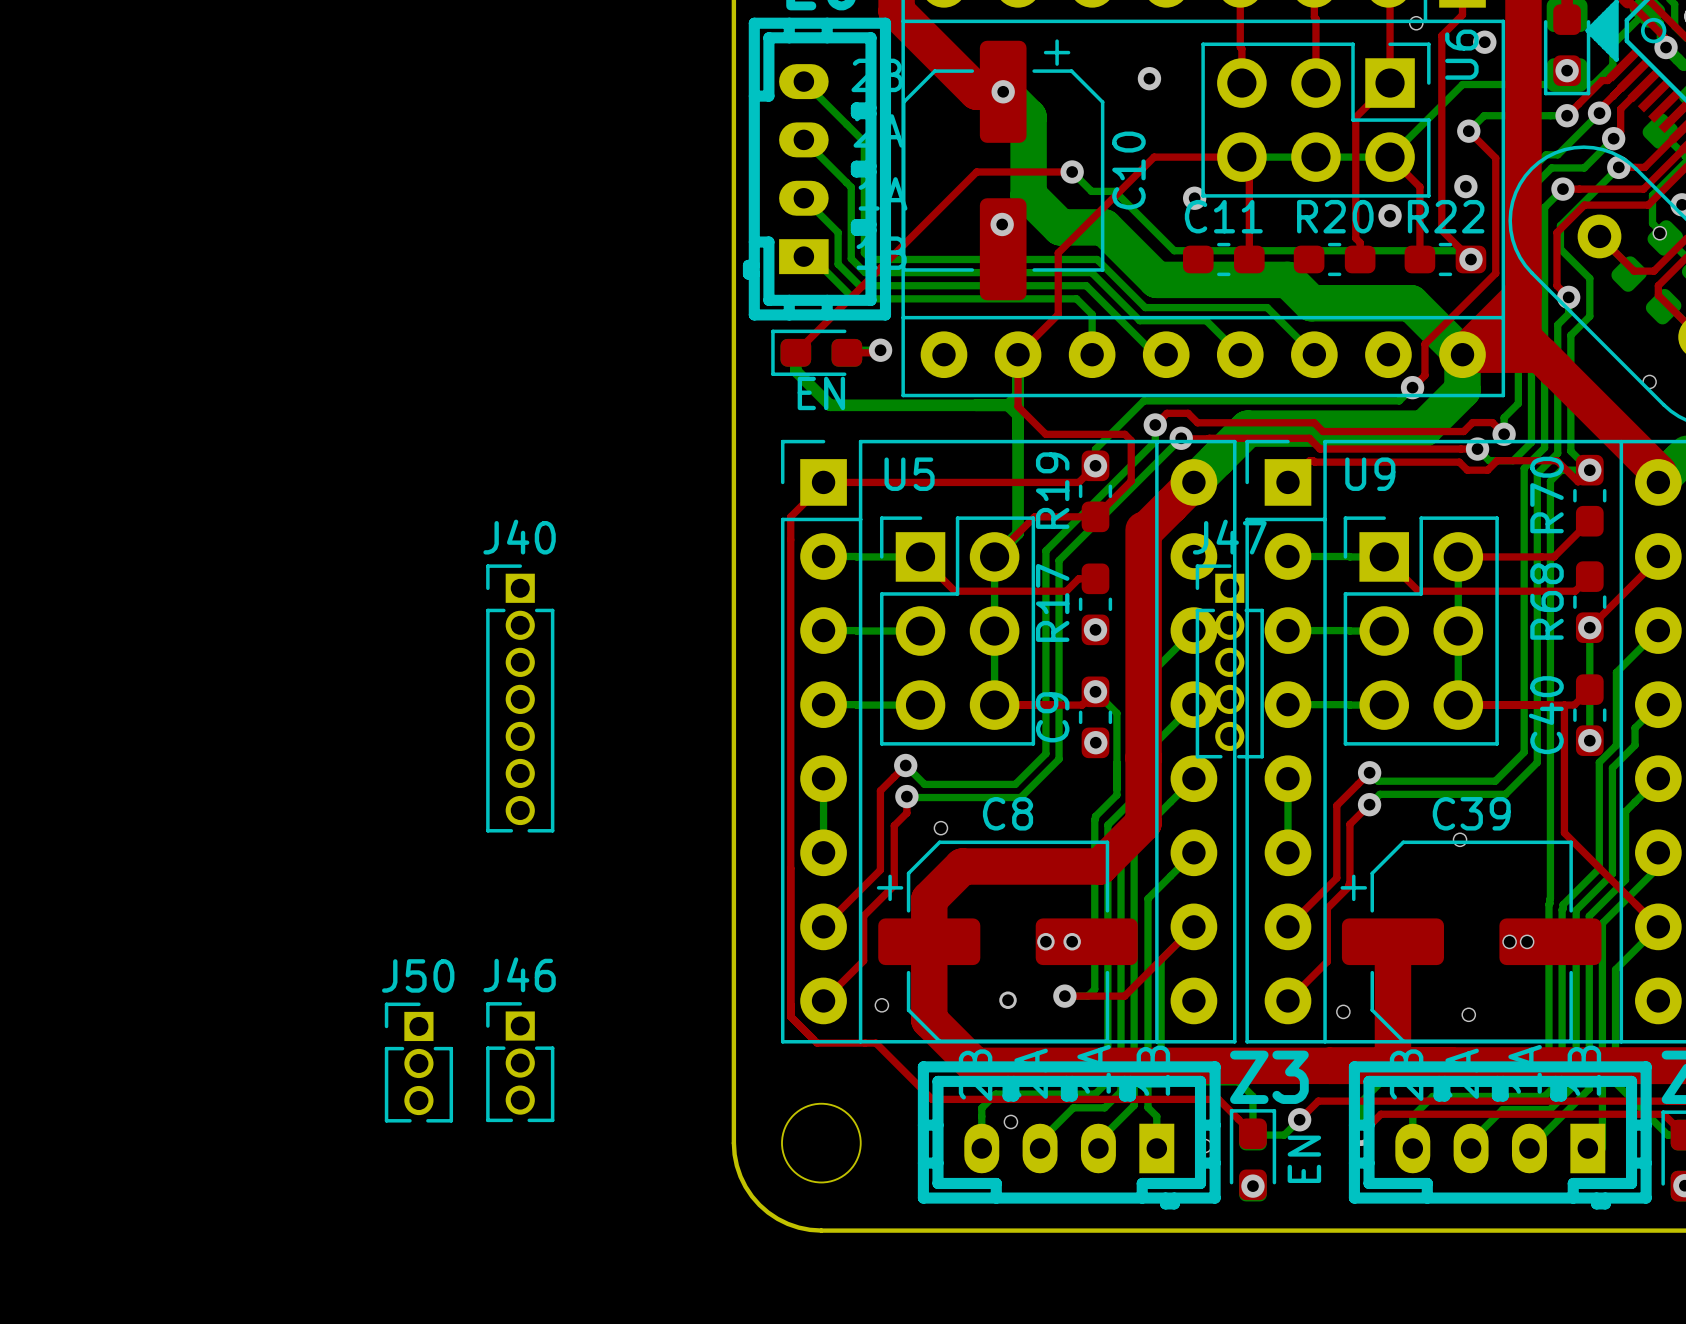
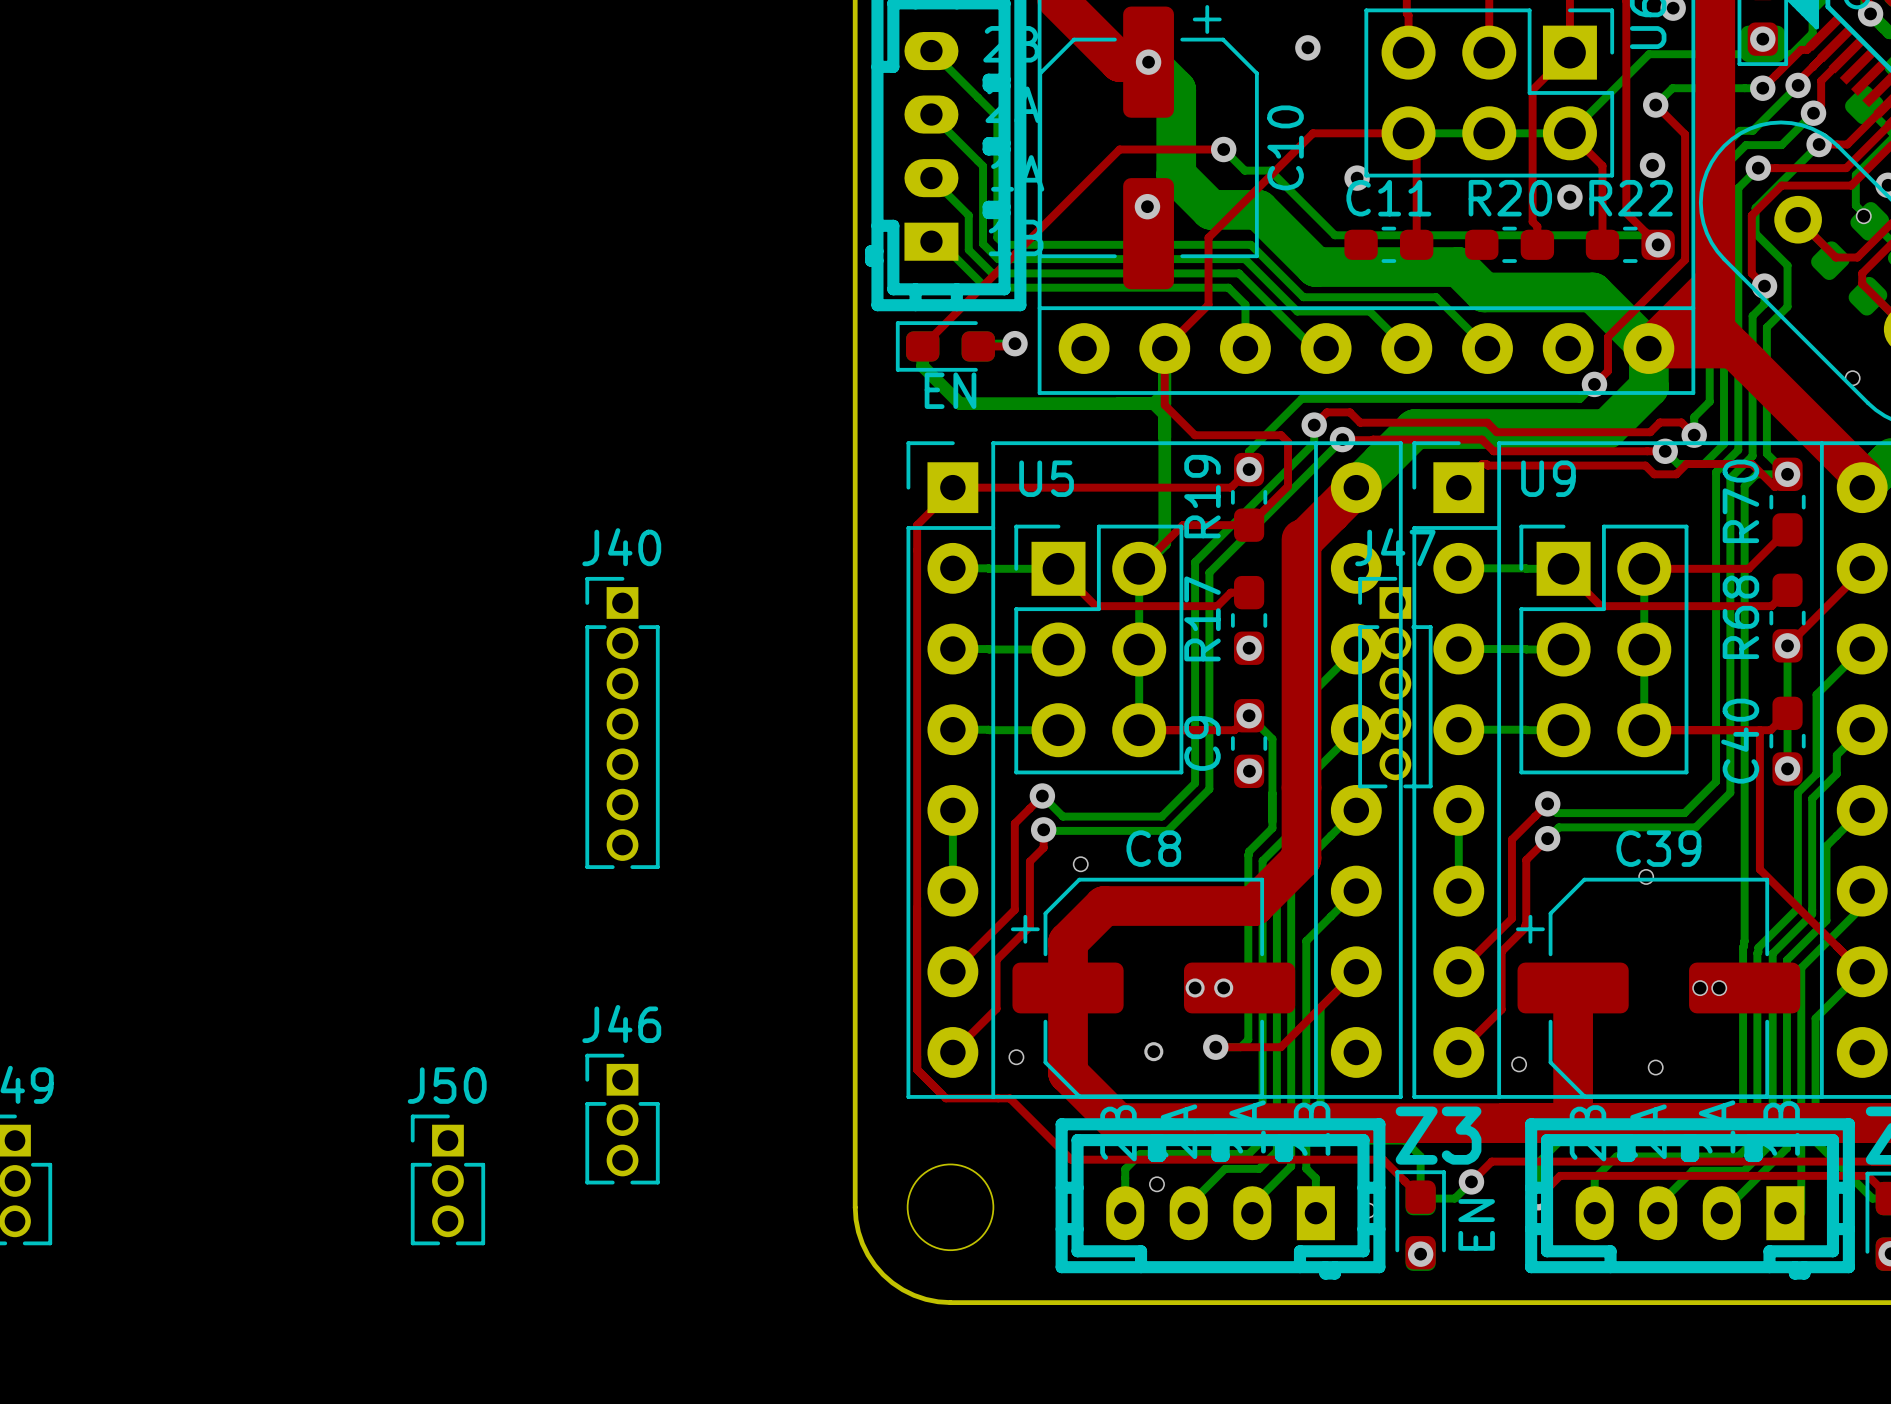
J50 position: (418, 1062) -> (447, 1179)

